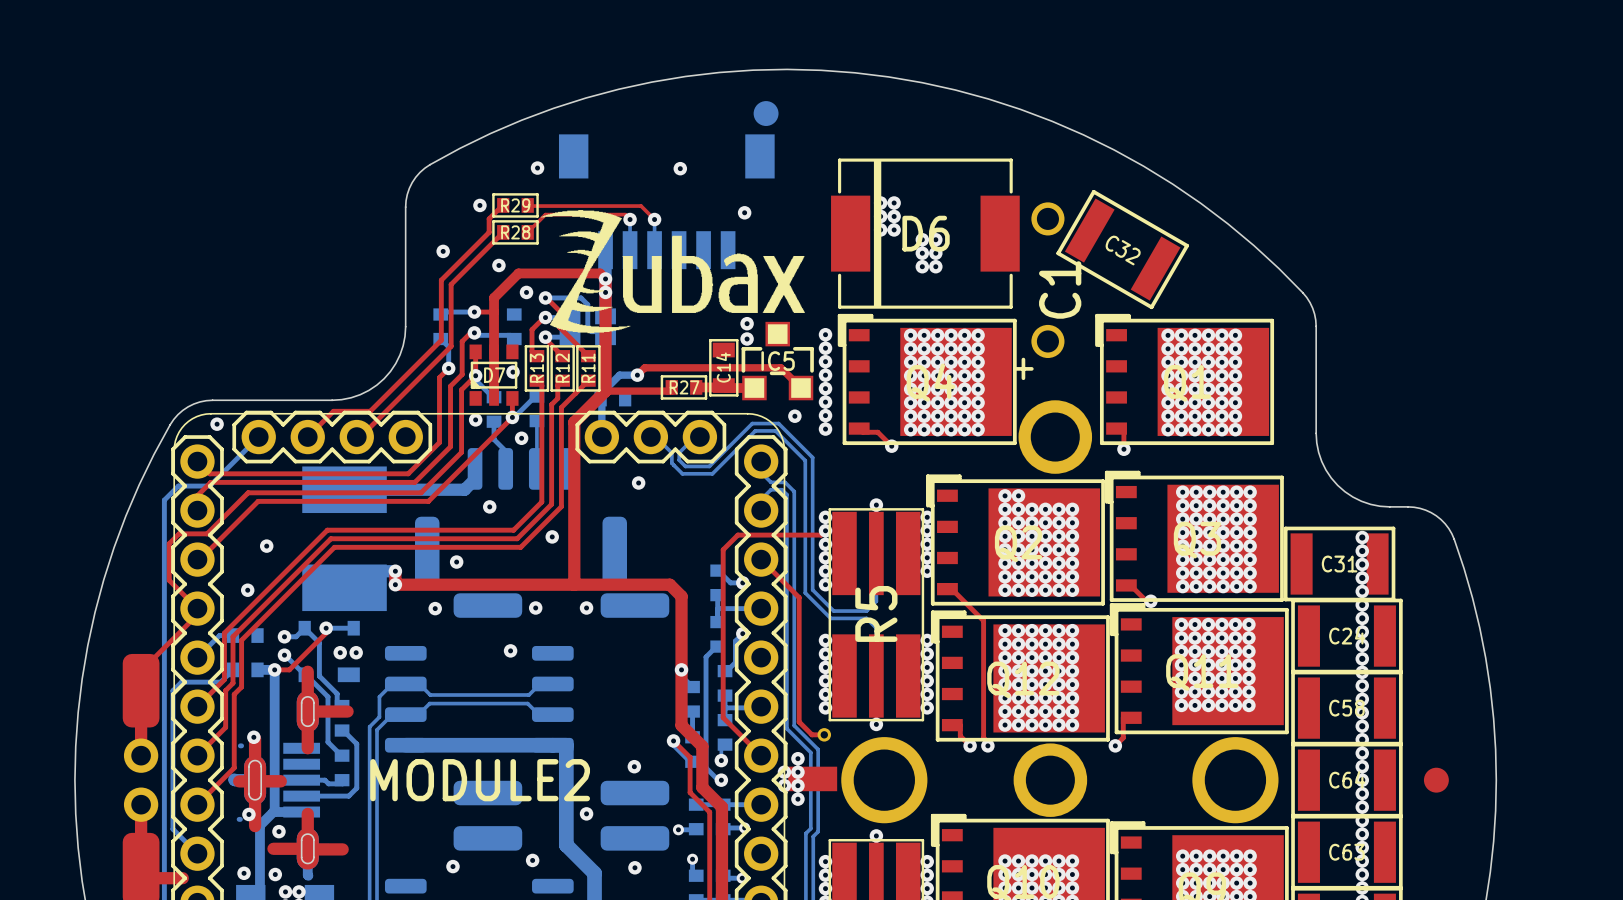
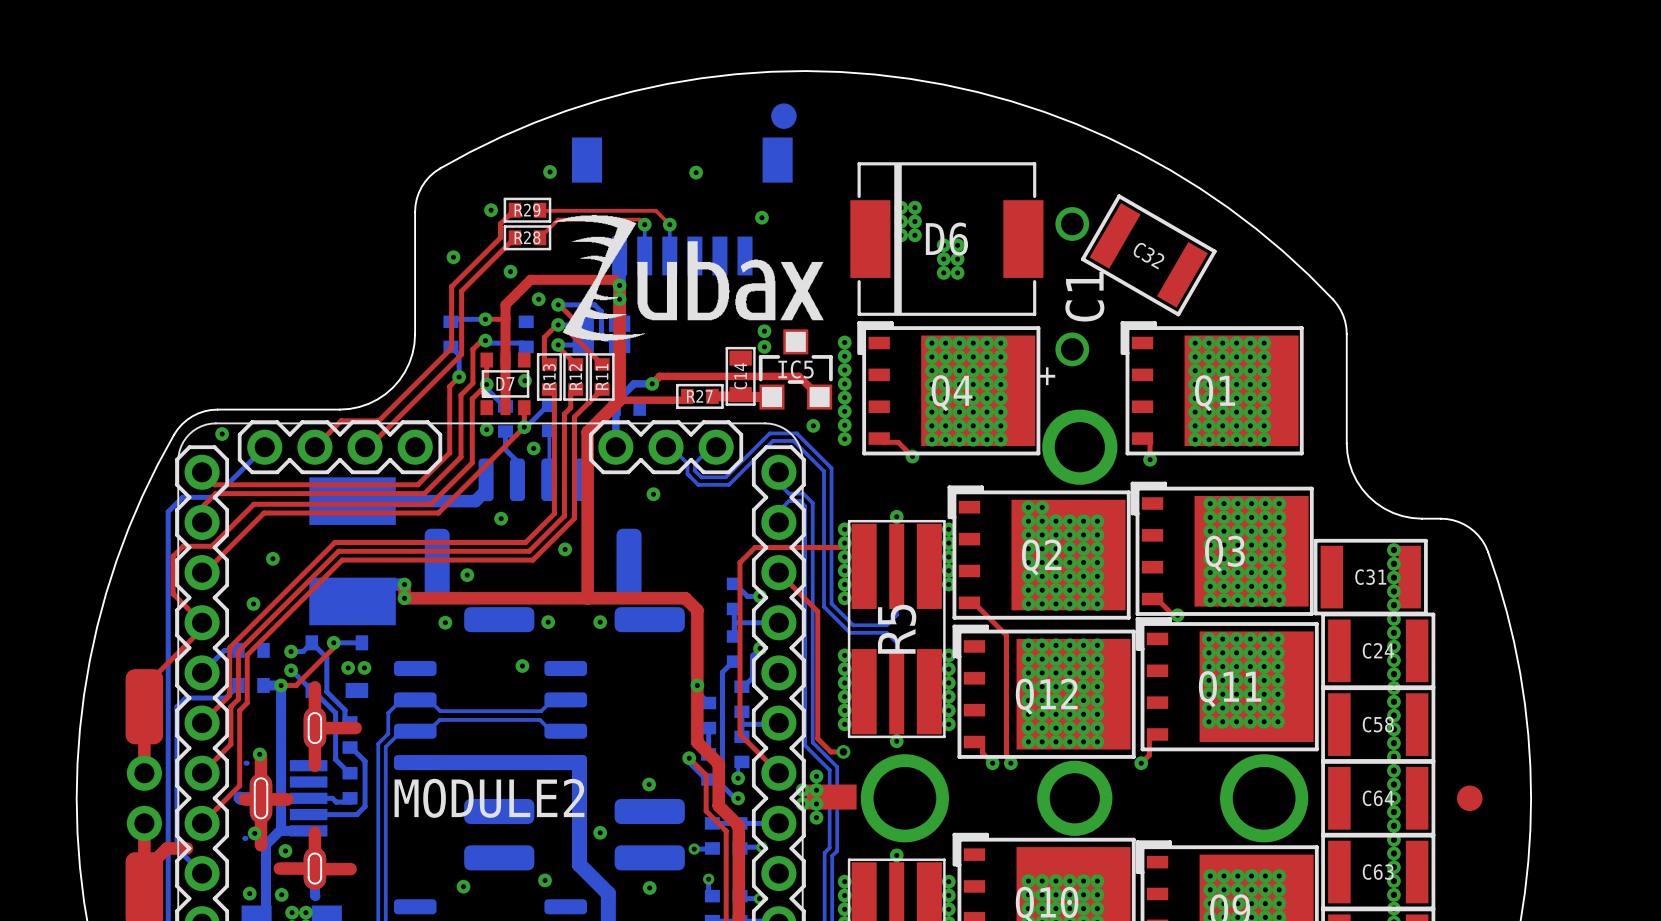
top track: none -> (187, 848) (166, 848) (144, 871)
top track: (141, 869) (147, 878) (182, 878) -> none

